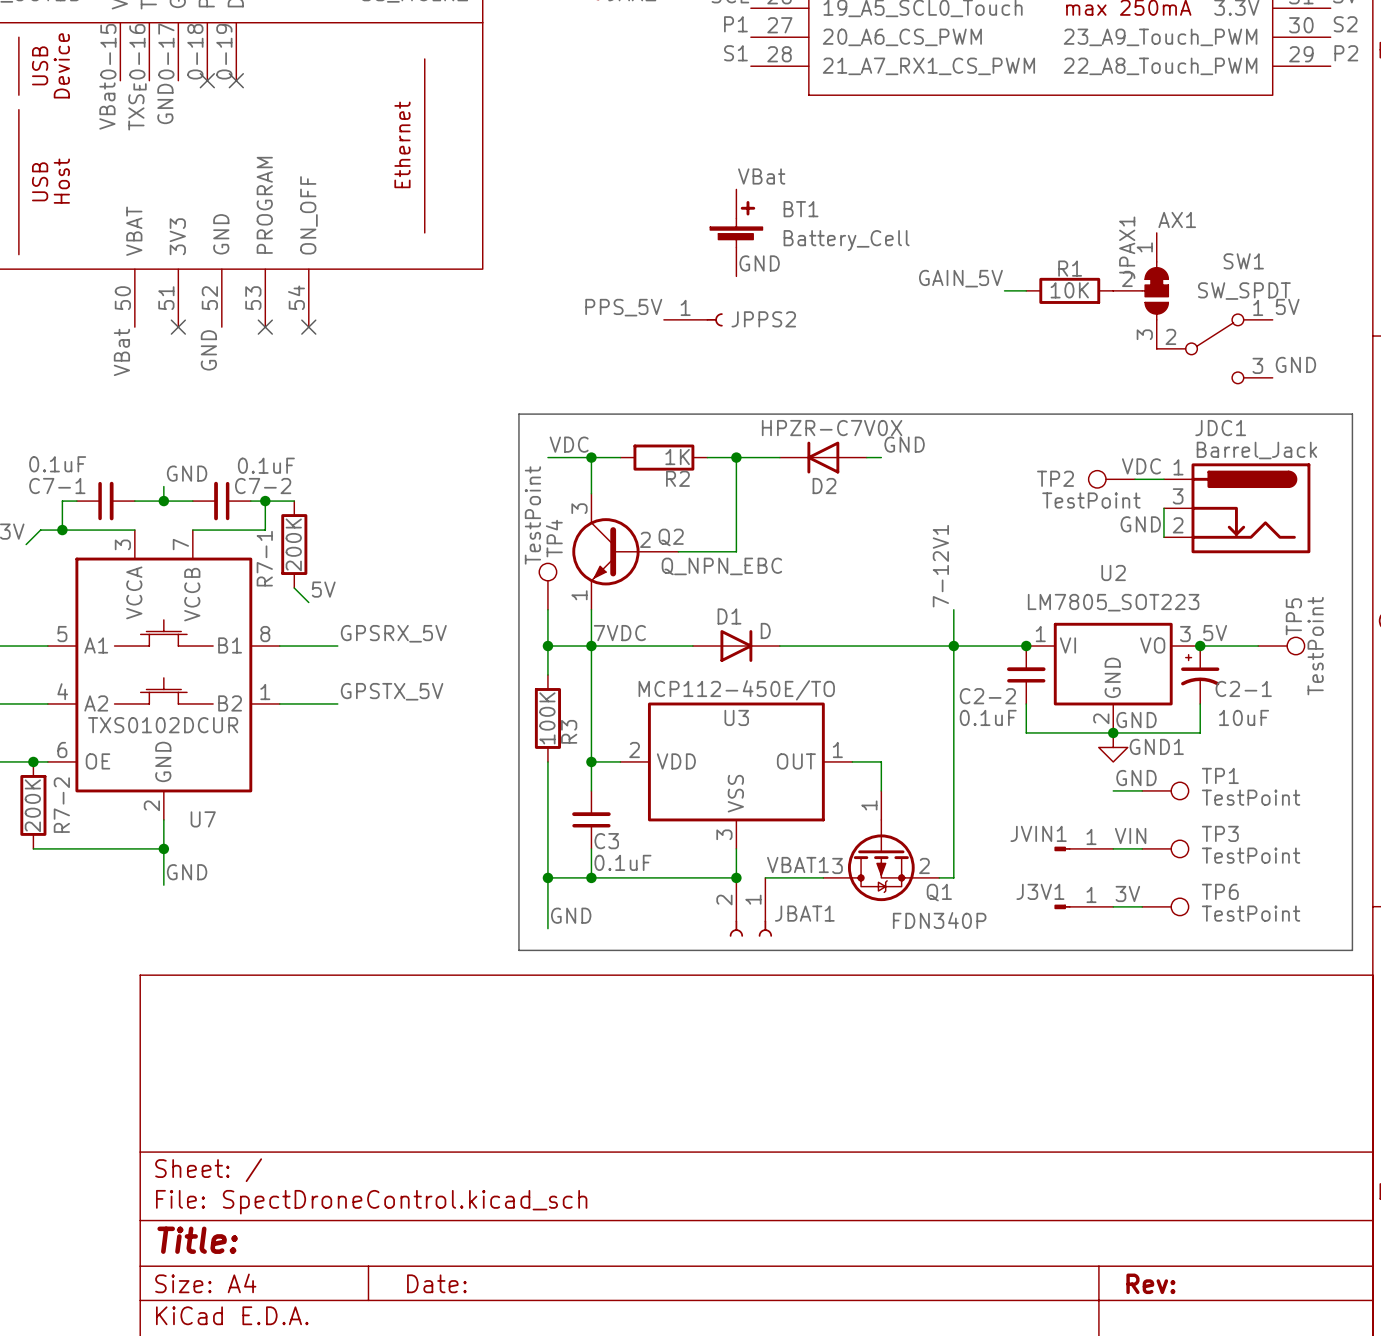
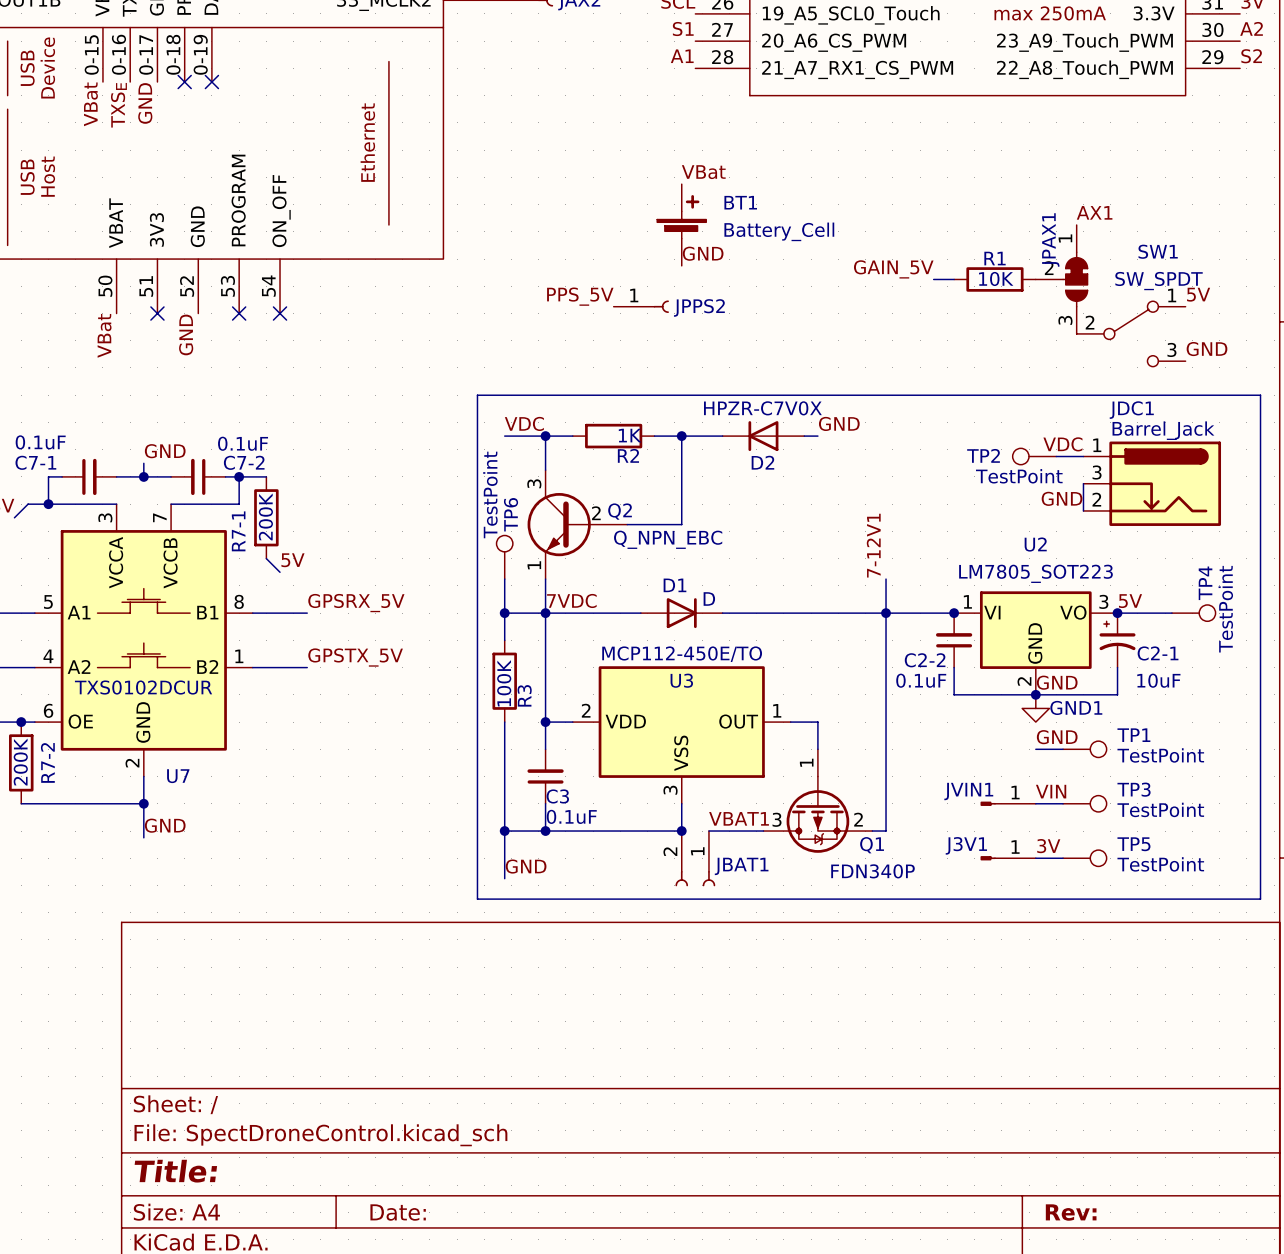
label: P1 (735, 24) -> S1 (683, 29)
label: S2 (1345, 24) -> A2 (1251, 28)
label: S1 (735, 53) -> A1 (682, 56)
label: P2 (1346, 53) -> S2 (1251, 56)
TP4 name: TP4 (554, 538) -> TP6 (511, 514)
TP5 name: TP5 (1293, 616) -> TP4 (1205, 583)
TP6 name: TP6 (1220, 891) -> TP5 (1133, 844)

